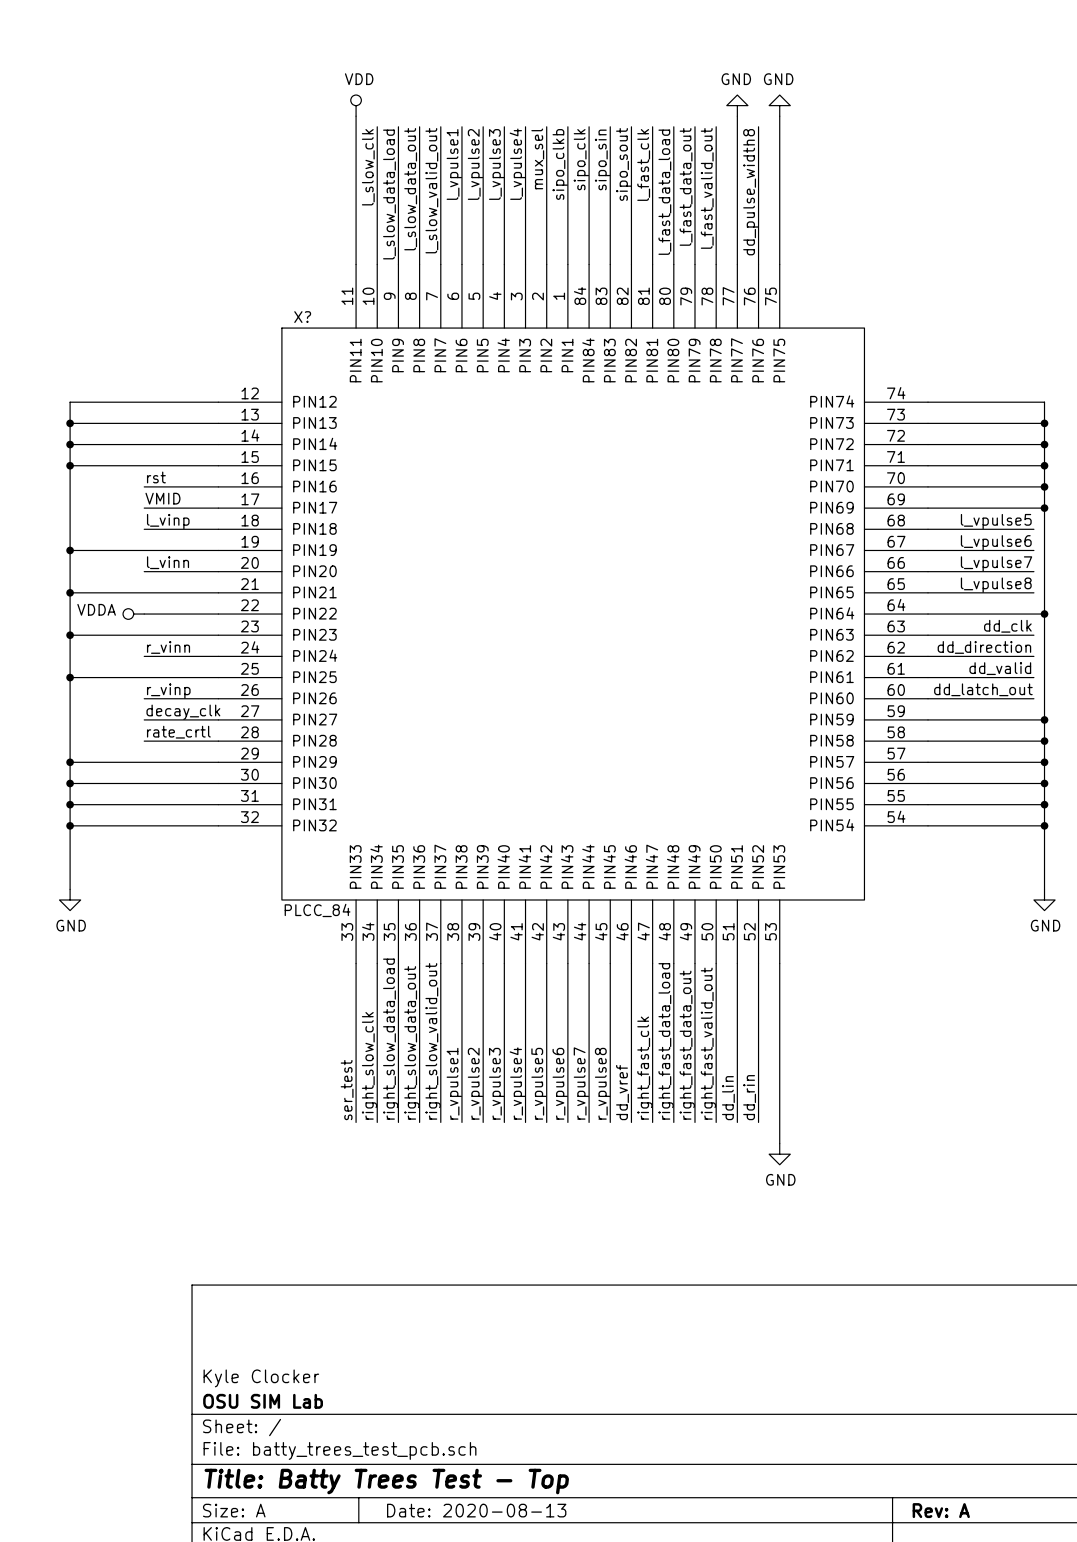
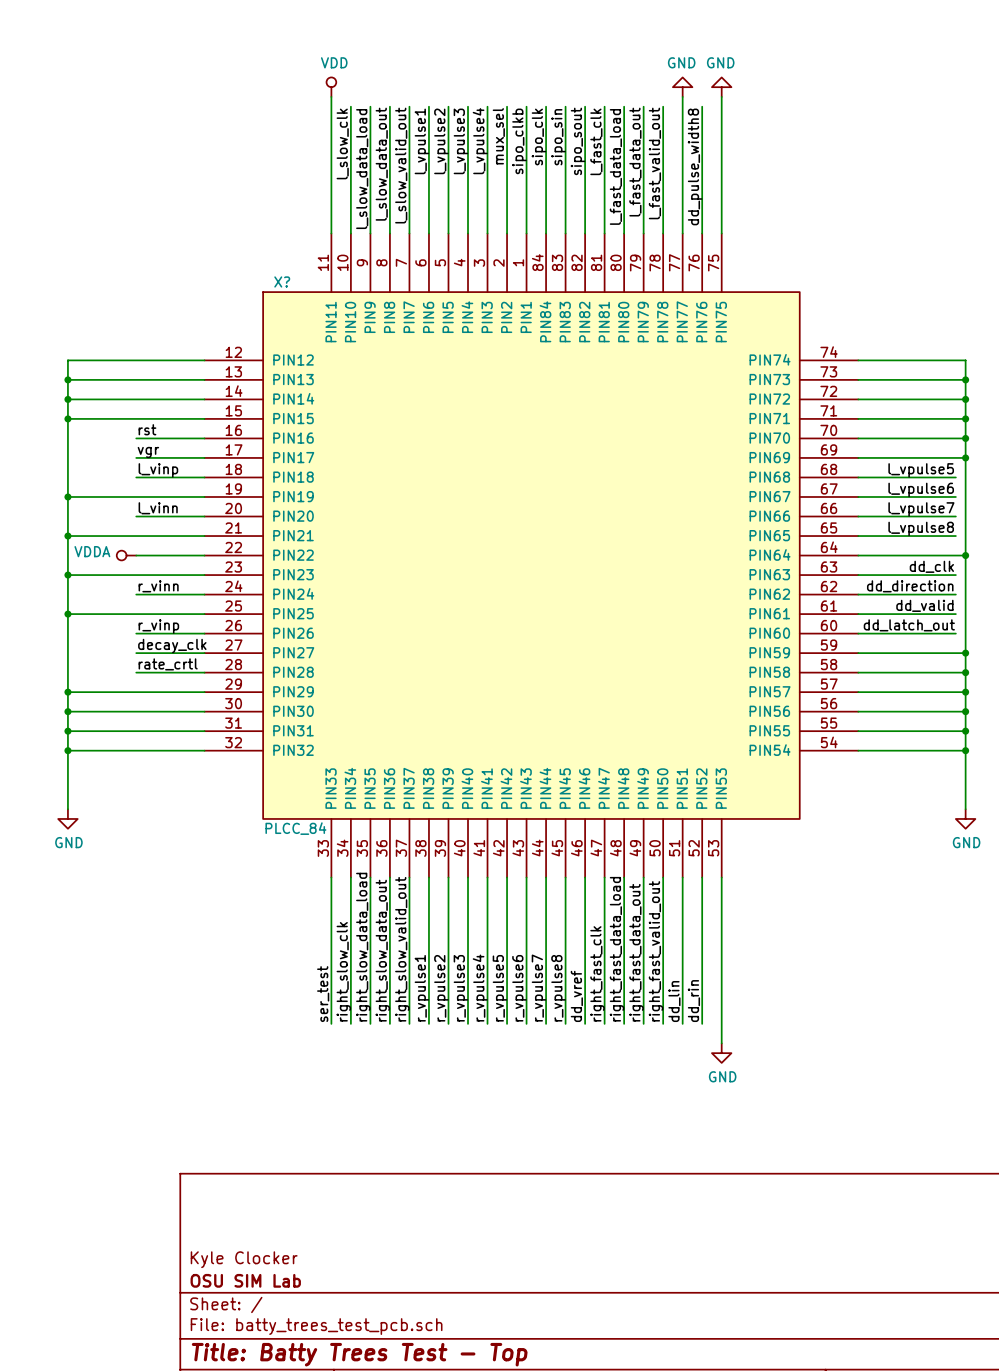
label: VMID (162, 498) -> vgr (148, 452)

